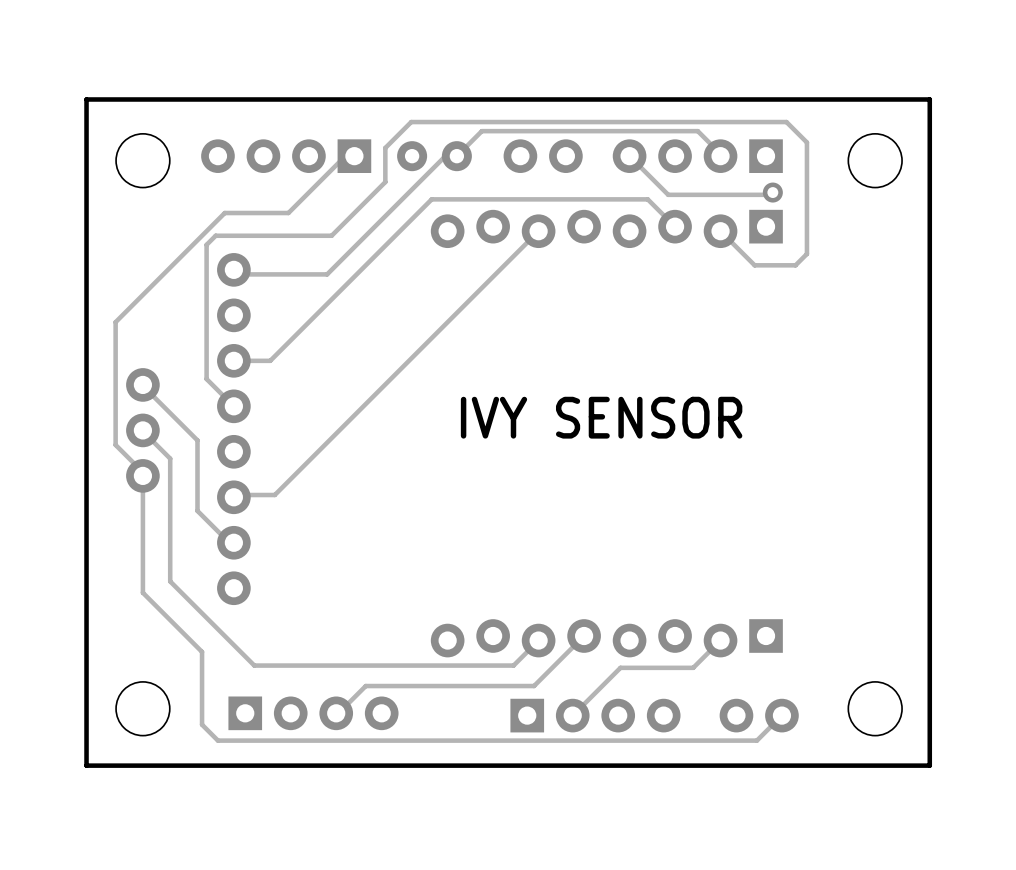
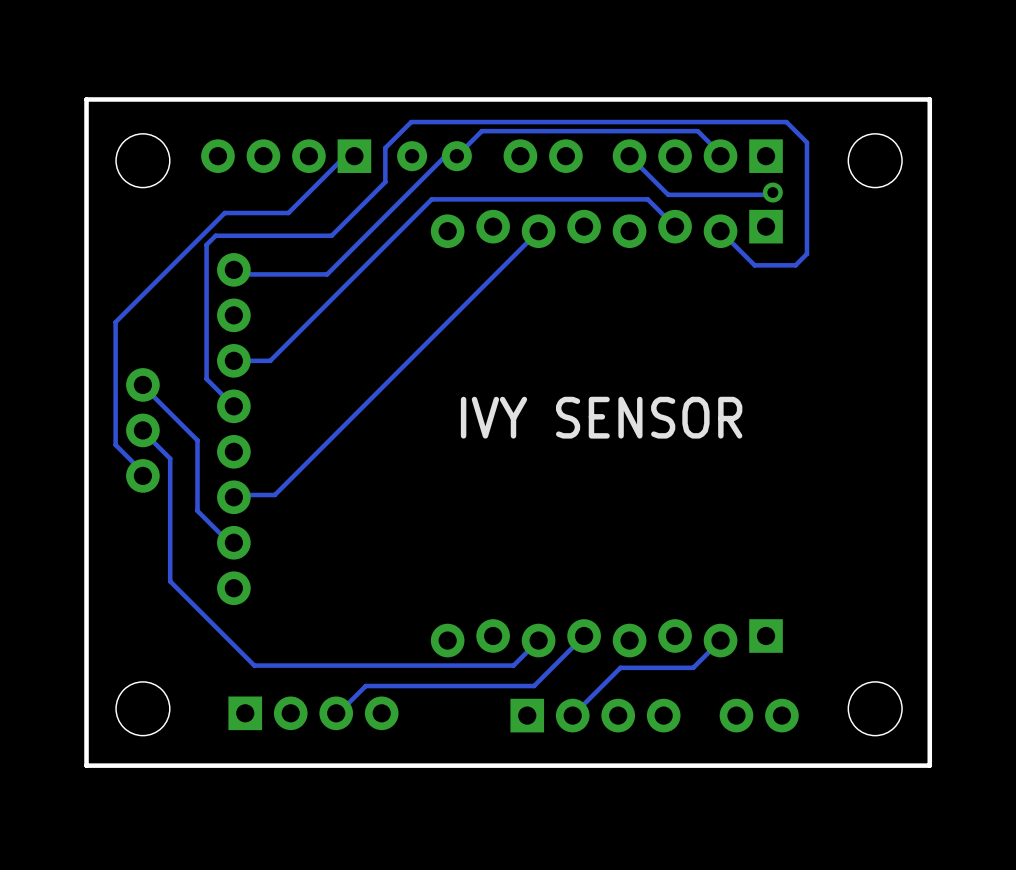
track: (142, 475) (142, 592) (202, 651) (202, 724) (217, 740) (756, 740) (781, 715) -> none

